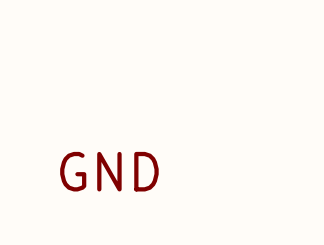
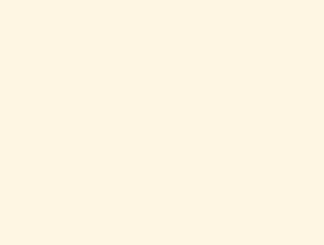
label: GND (109, 171) -> none

